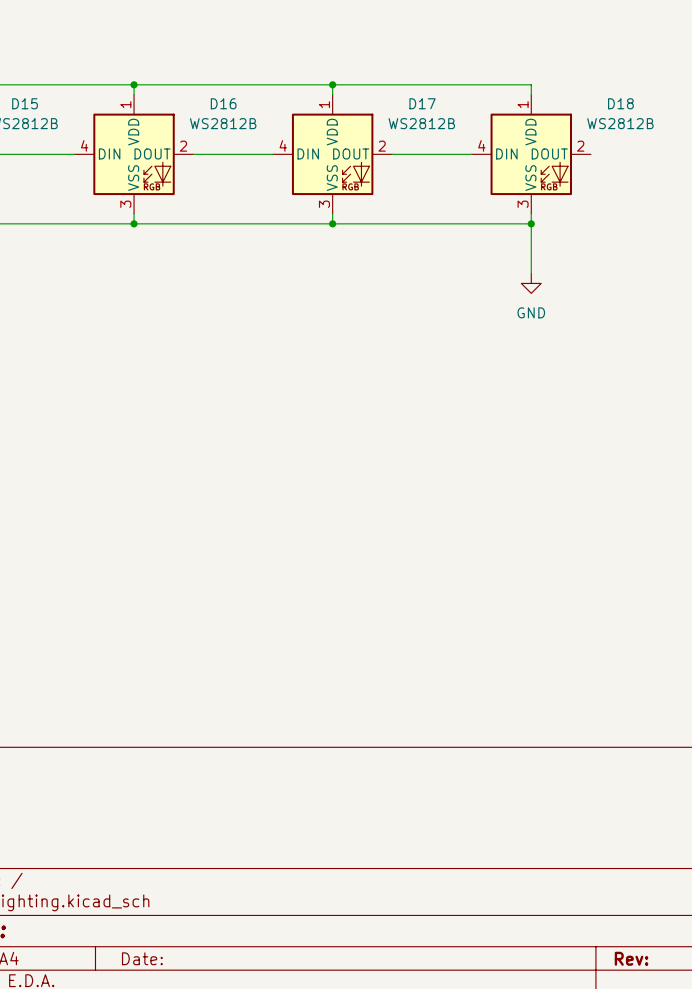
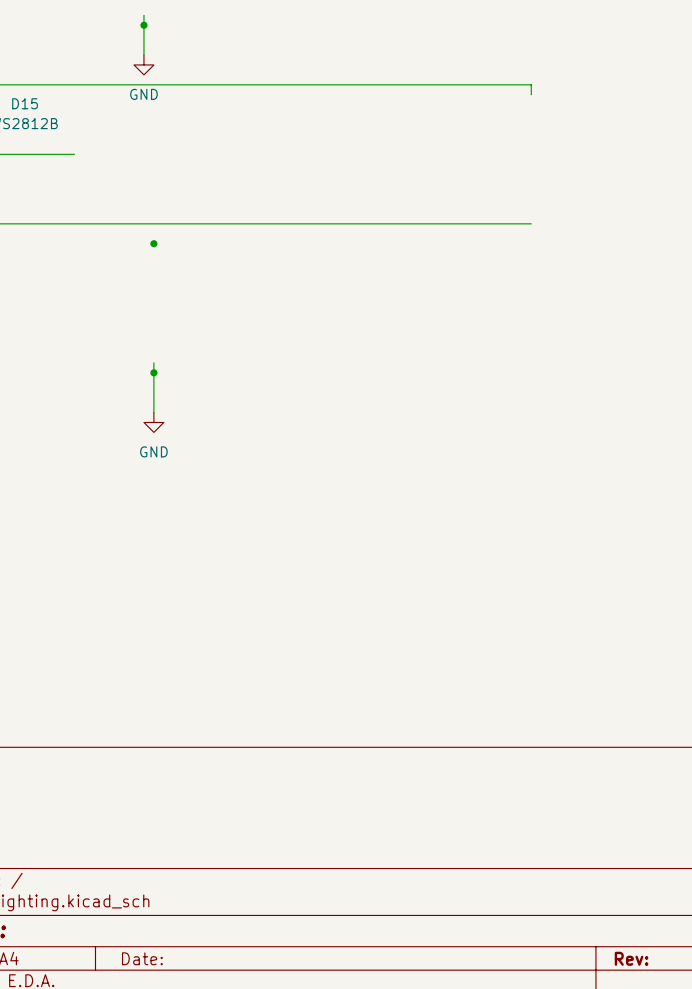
wire: none -> (143, 15) (143, 55)
junction: none -> (143, 25)
power symbol: none -> GND (143, 64)
wire: (134, 84) (134, 94) -> none
junction: (134, 84) -> none
wire: (332, 84) (332, 94) -> none
junction: (332, 84) -> none
D16: WS2812B (134, 154) -> none
wire: (193, 154) (273, 154) -> none
D17: WS2812B (332, 154) -> none
wire: (392, 154) (471, 154) -> none
D18: WS2812B (531, 154) -> none
wire: (134, 213) (134, 223) -> none
wire: (332, 213) (332, 223) -> none
wire: (531, 213) (531, 273) -> none
junction position: (134, 223) -> (153, 243)
junction: (332, 223) -> none
junction: (531, 223) -> none
power symbol: GND (531, 283) -> none
wire: none -> (153, 362) (153, 412)
junction: none -> (153, 372)
power symbol: none -> GND (153, 422)

